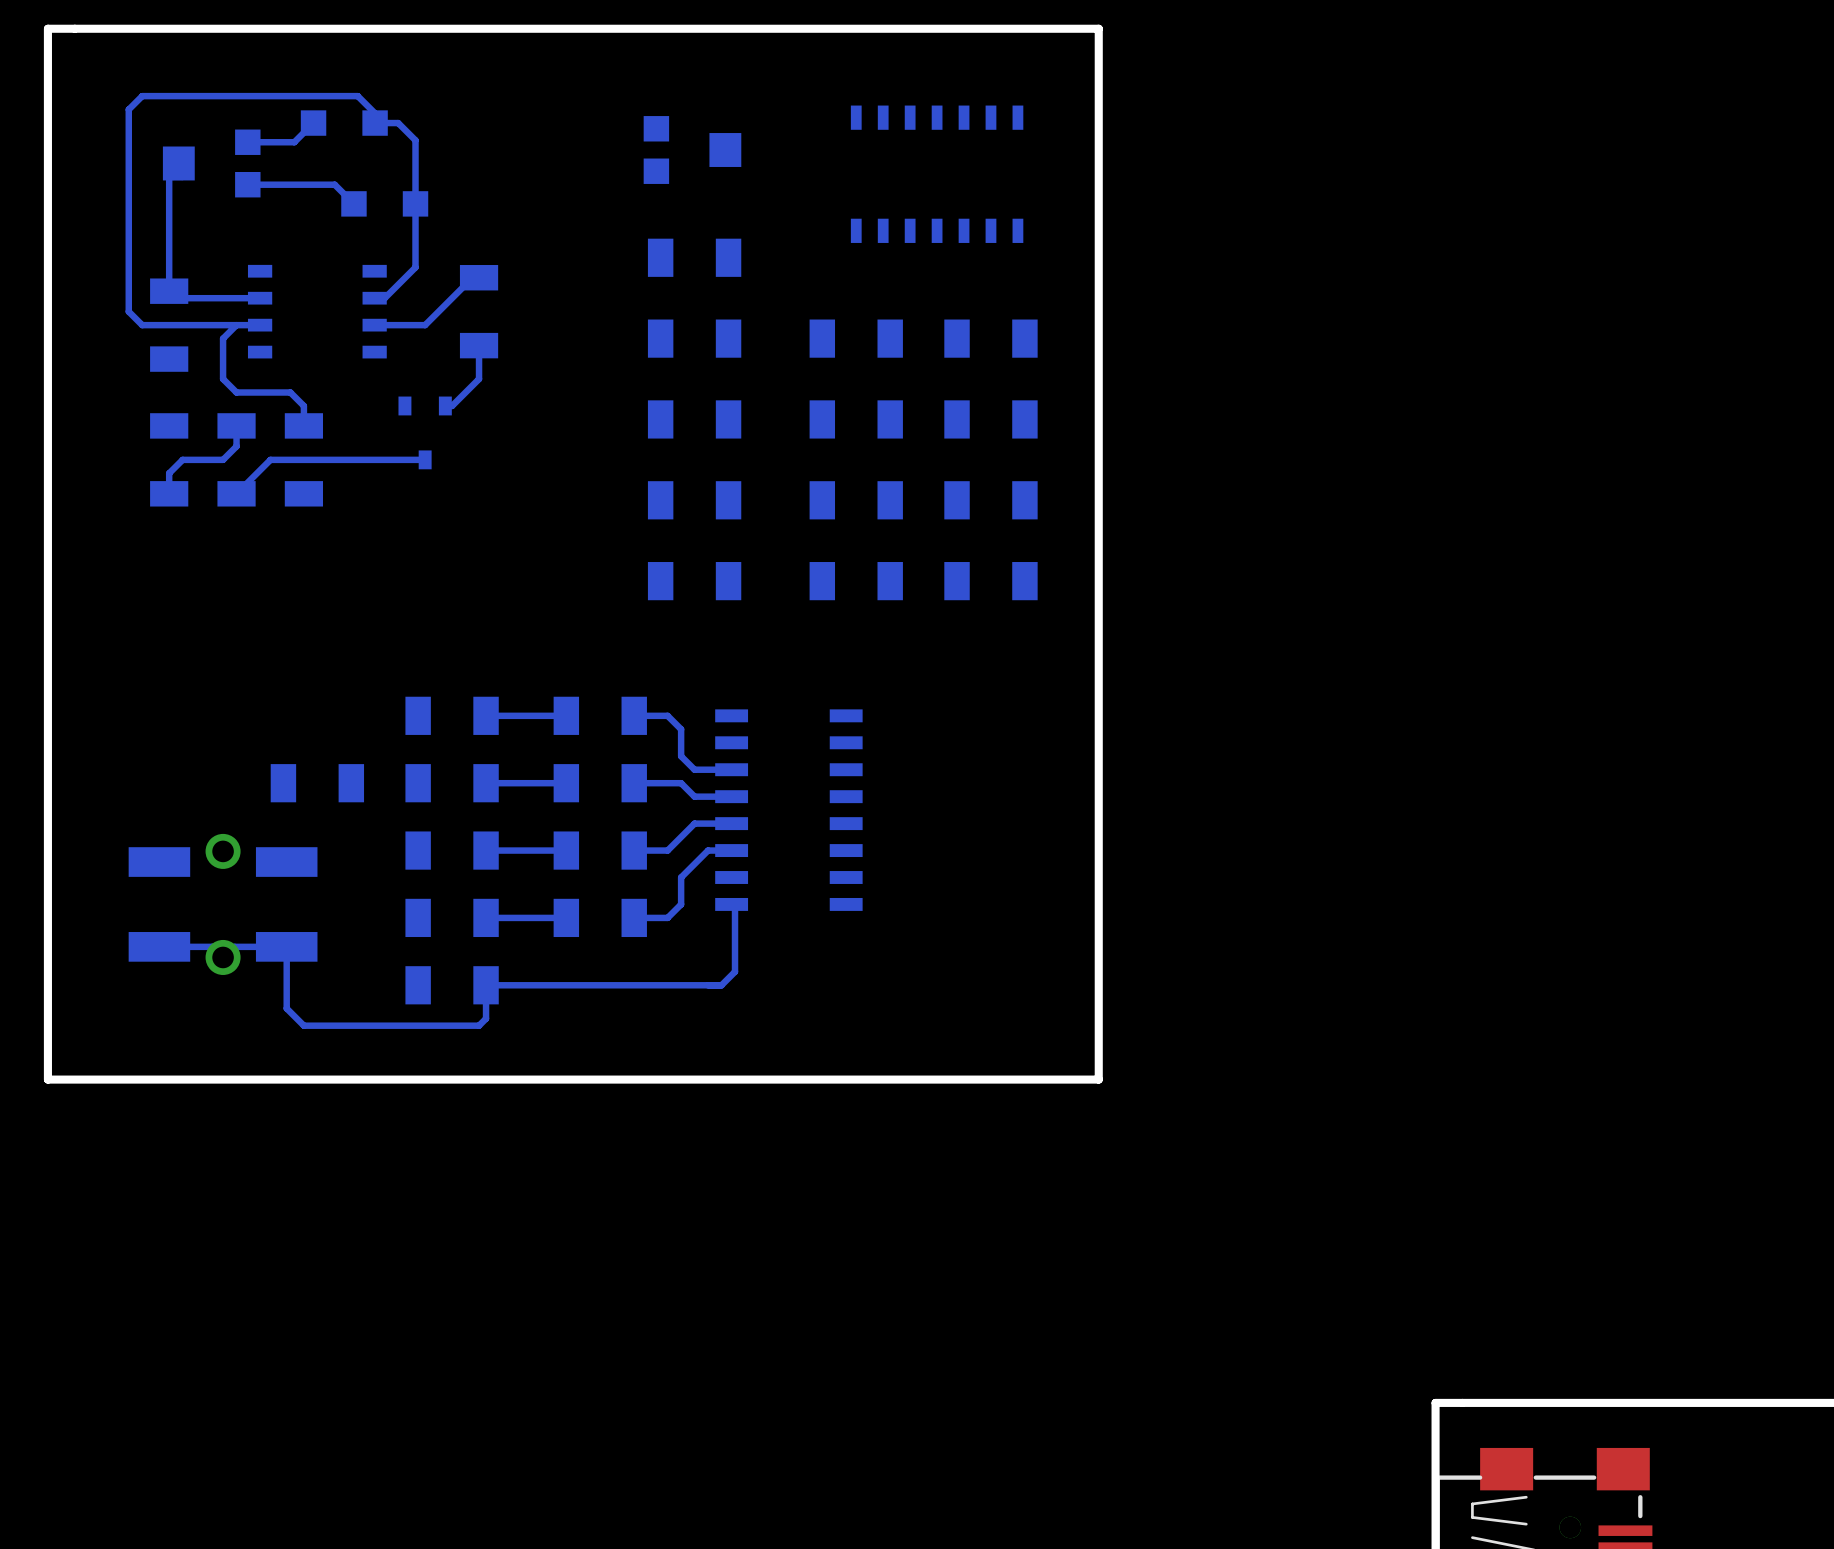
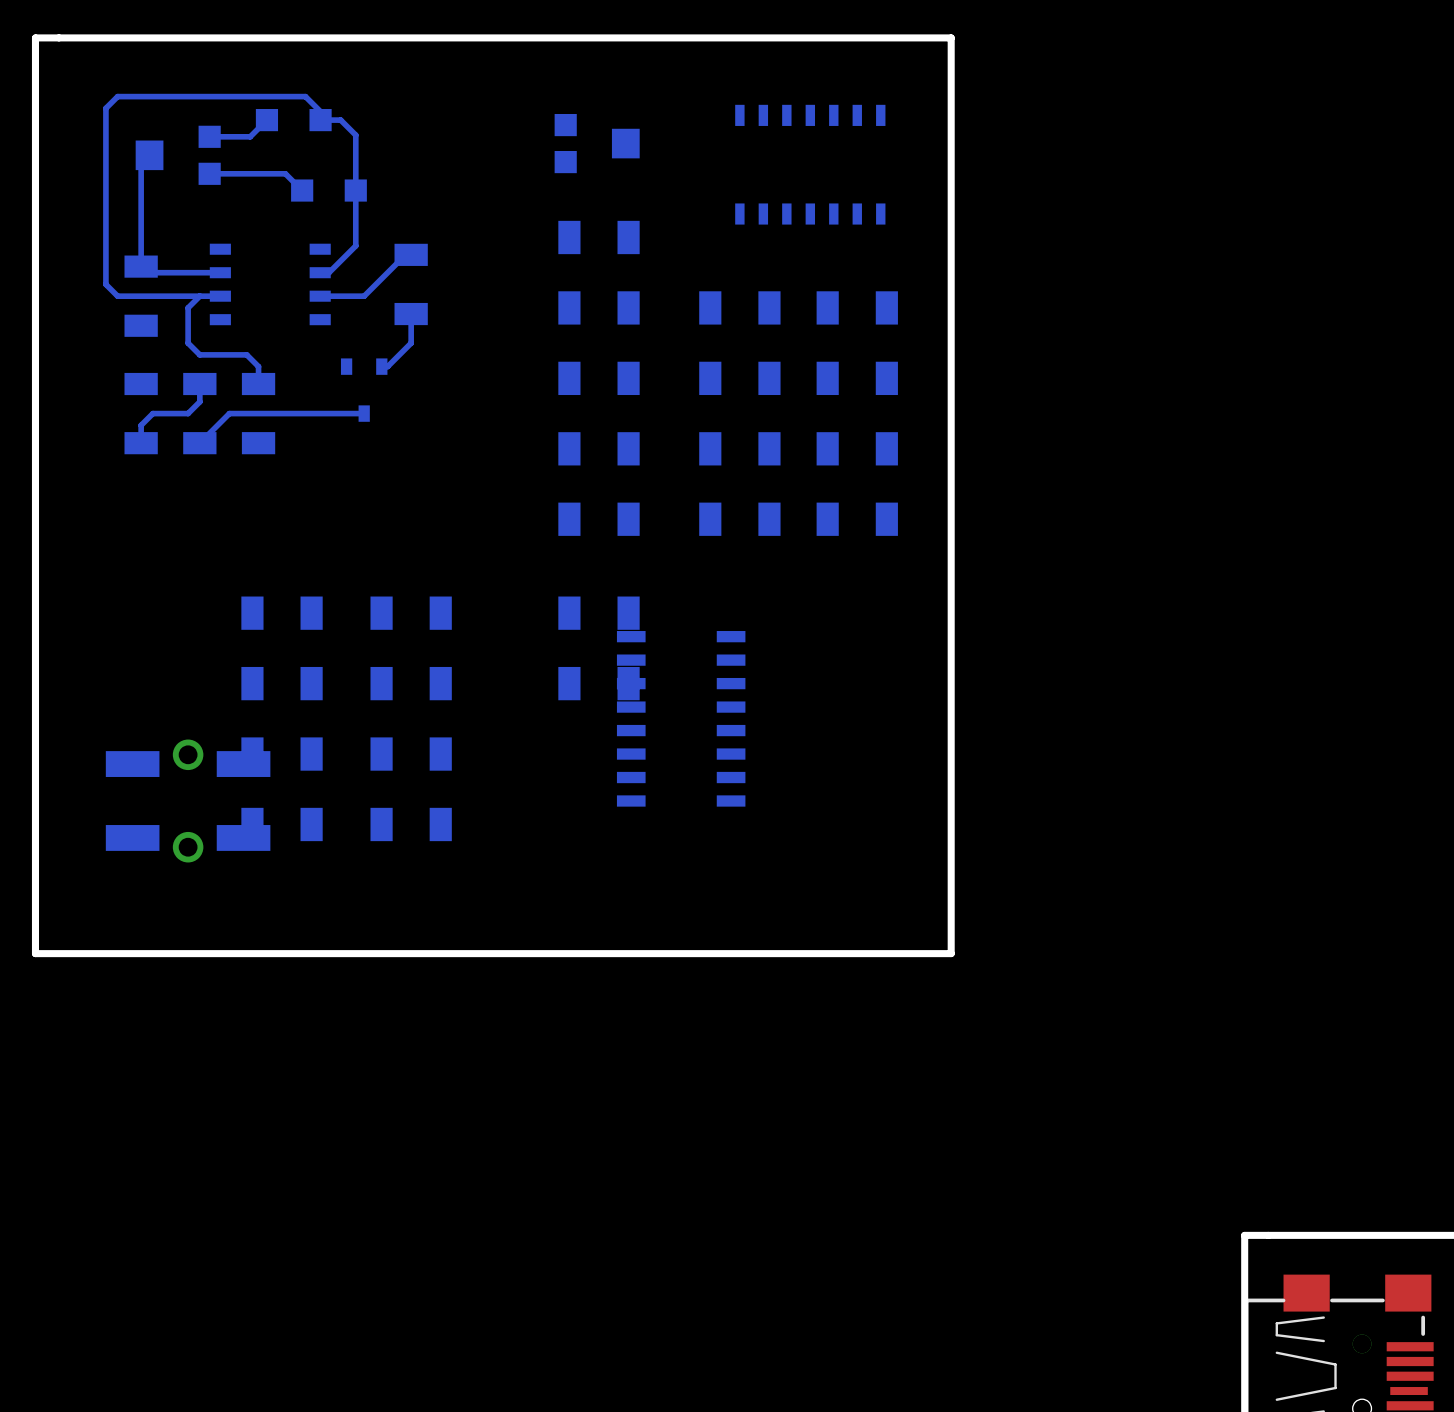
part: none -> (282, 613)
part: none -> (411, 613)
part: none -> (599, 613)
part: (452, 715) -> none
bottom track: (486, 715) (566, 715) -> none
part: (600, 715) -> none
bottom track: (634, 715) (667, 715) (681, 729) (681, 756) (694, 769) (731, 769) -> none
part: none -> (411, 683)
part: none -> (599, 683)
part position: (317, 783) -> (282, 683)
part: (452, 783) -> none
bottom track: (486, 783) (566, 783) -> none
part: (600, 783) -> none
bottom track: (634, 783) (681, 783) (694, 796) (731, 796) -> none
bottom track: (731, 823) (694, 823) (667, 850) (634, 850) -> none
part: none -> (282, 754)
part position: (452, 850) -> (411, 754)
bottom track: (486, 850) (566, 850) -> none
part: (600, 850) -> none
bottom track: (731, 850) (708, 850) (681, 877) (681, 904) (667, 917) (634, 917) -> none
bottom track: (731, 904) (735, 907) (735, 971) (721, 985) (486, 985) (486, 1018) (479, 1025) (303, 1025) (286, 1008) (286, 946) (234, 946) (223, 957) (212, 946) (159, 946) -> none
part: (452, 917) -> none
bottom track: (486, 917) (566, 917) -> none
part: (600, 917) -> none
part: none -> (282, 824)
part: none -> (411, 824)
part: (452, 985) -> none

